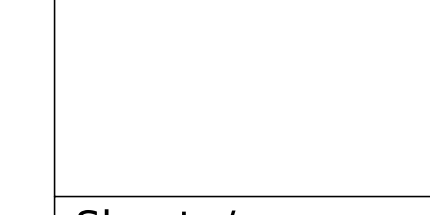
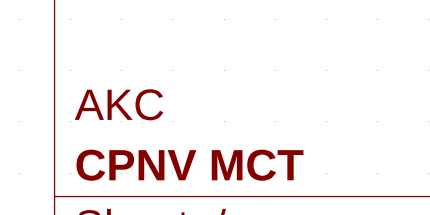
title block: none -> AKC (119, 104)
title block: none -> CPNV MCT (189, 165)

